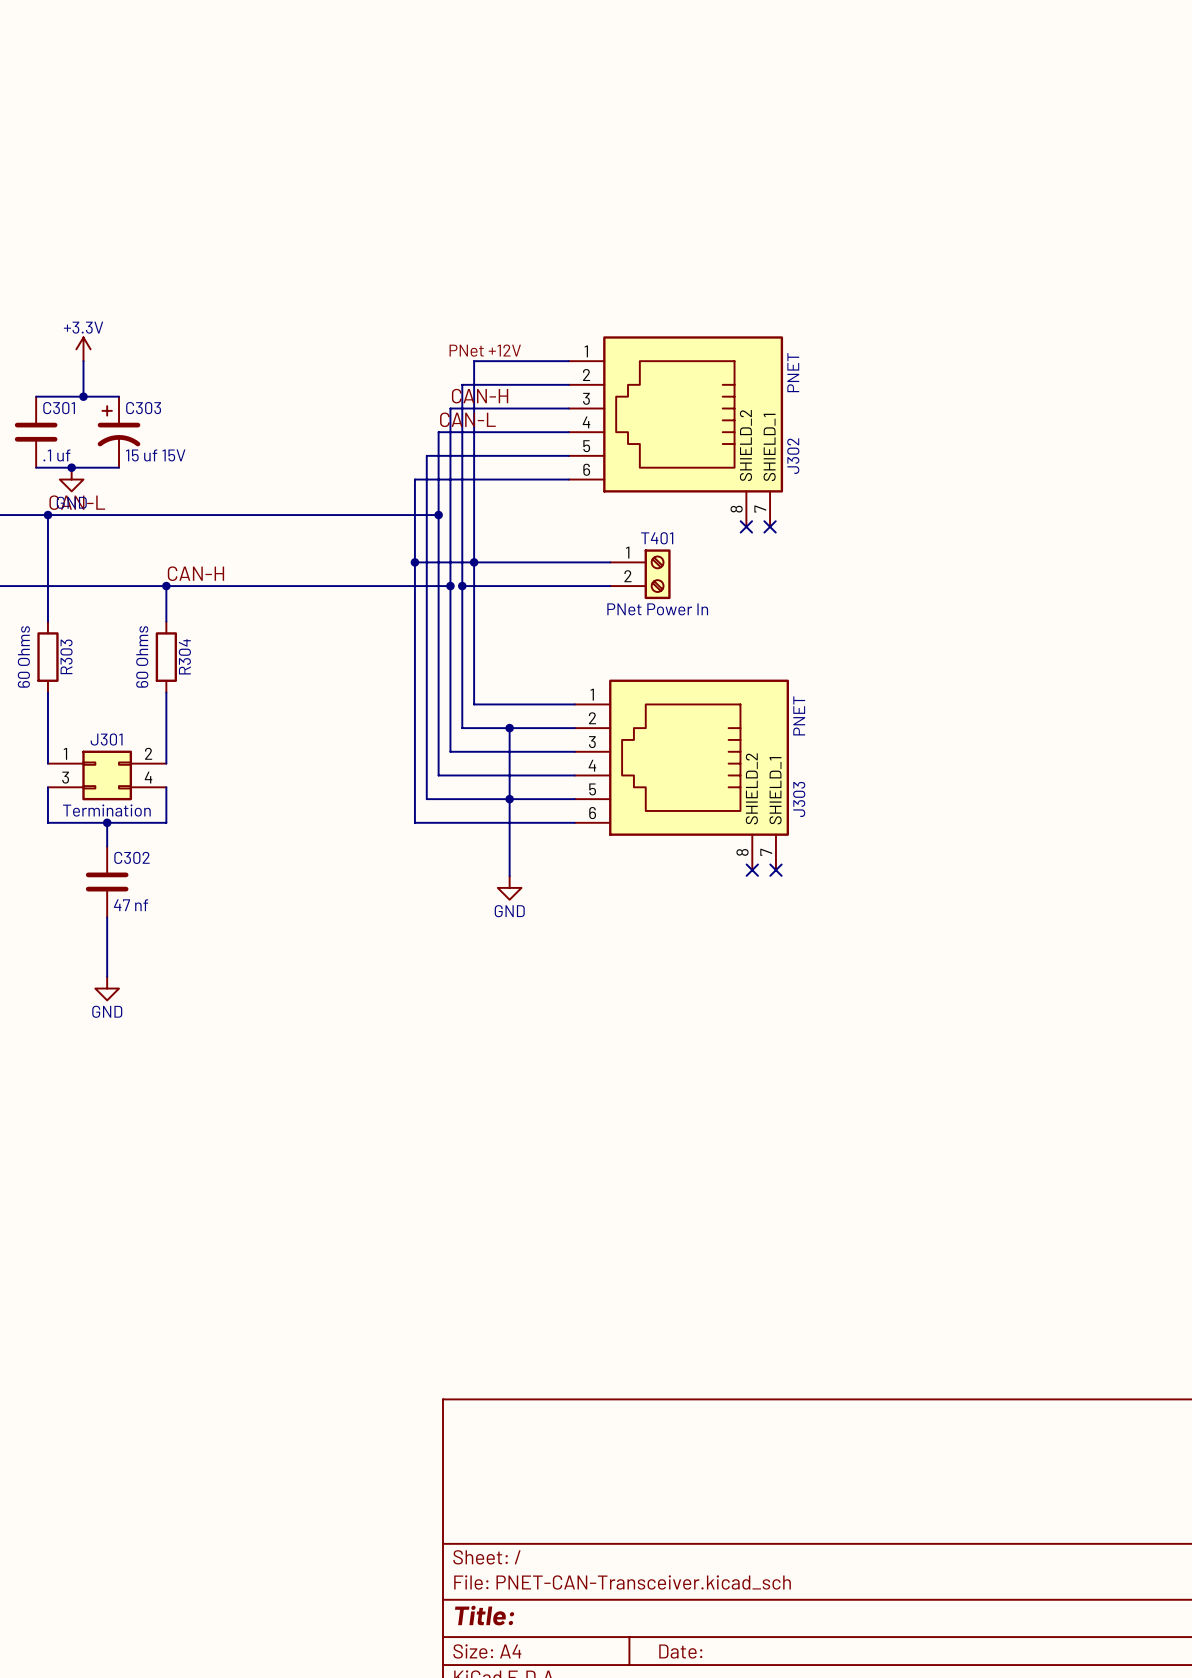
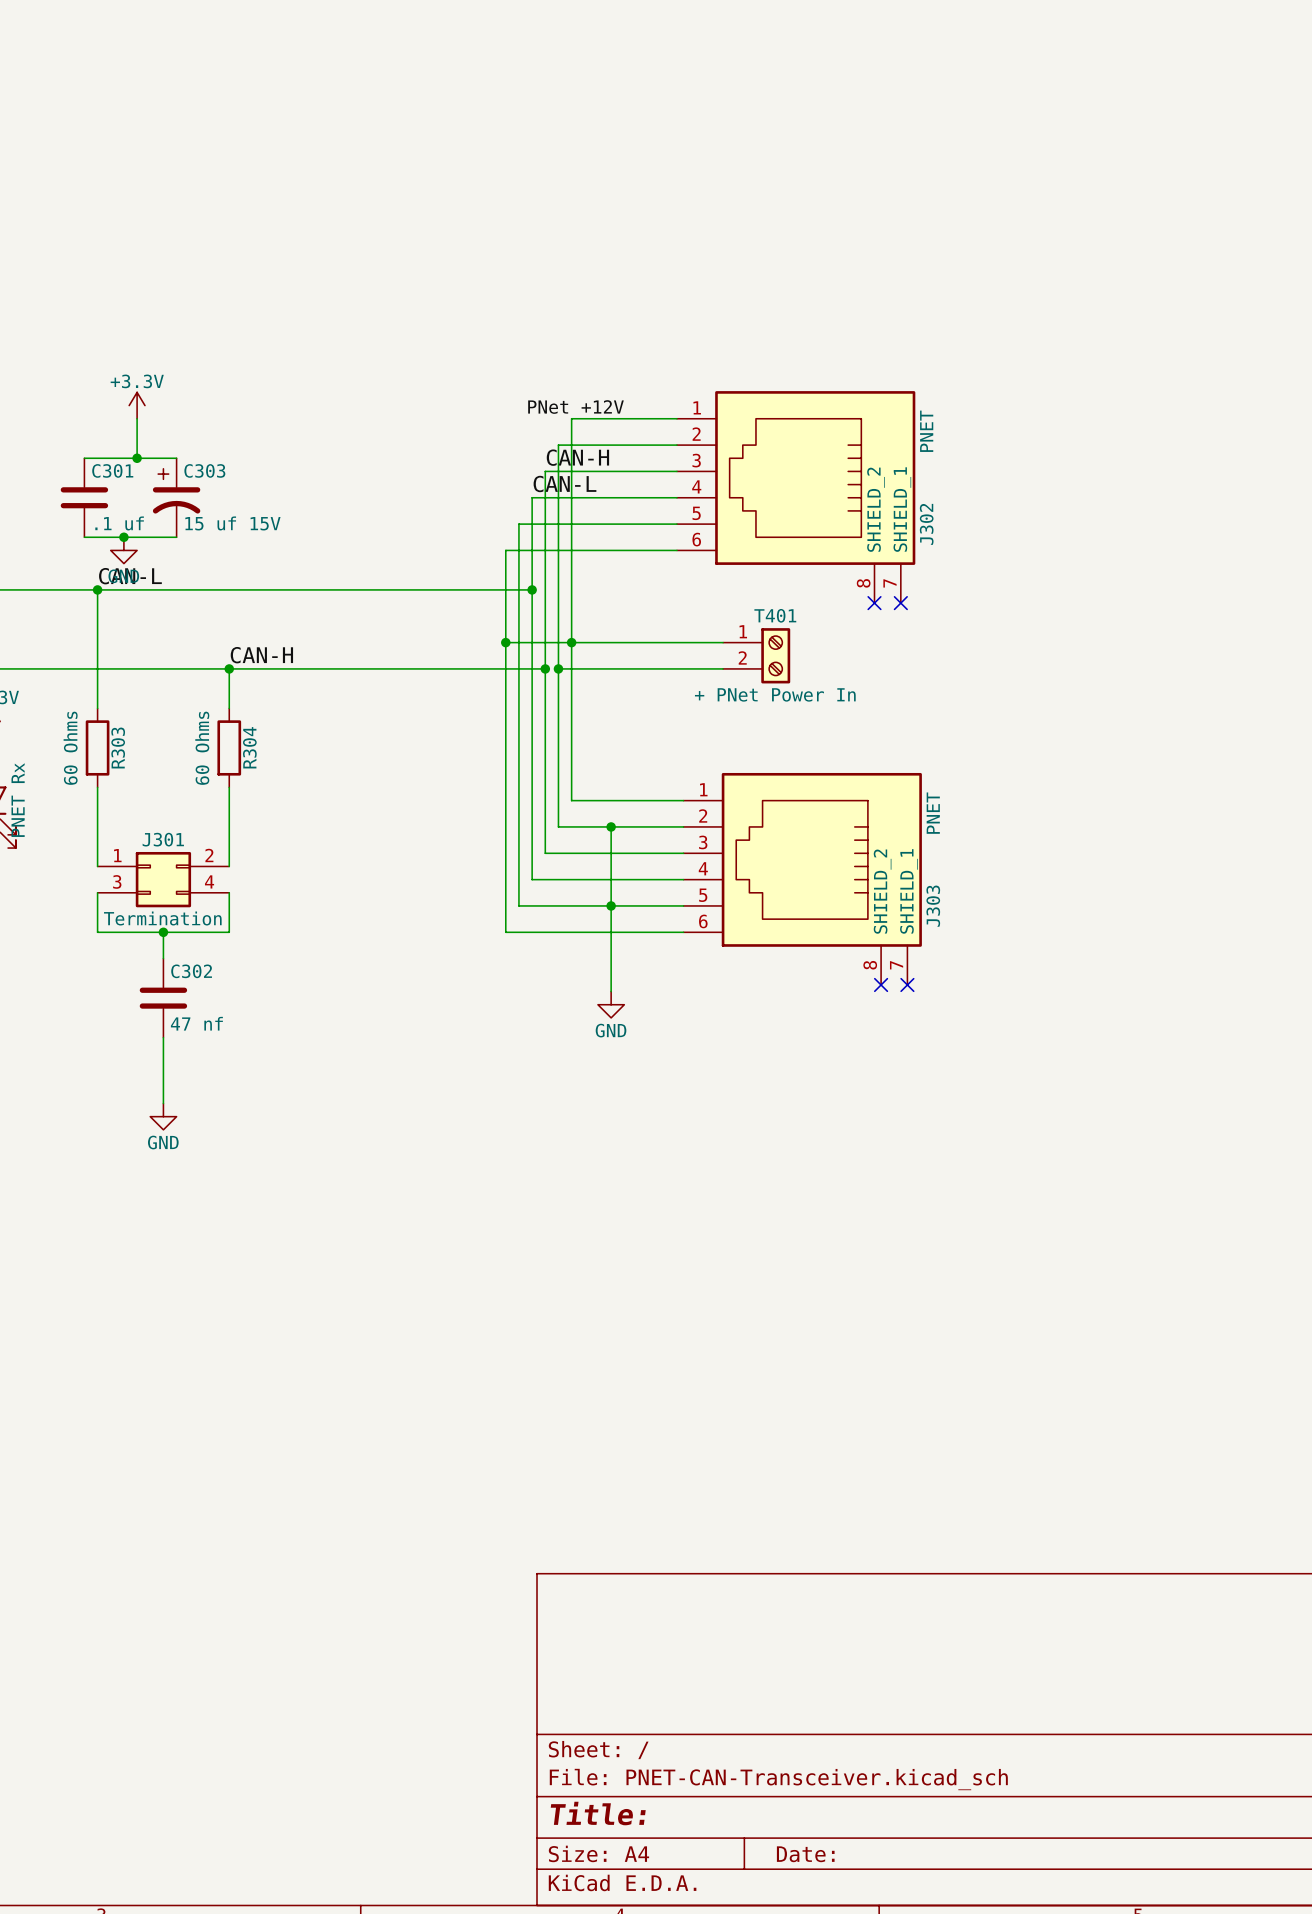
T401 value: PNet Power In (657, 609) -> + PNet Power In (775, 694)

